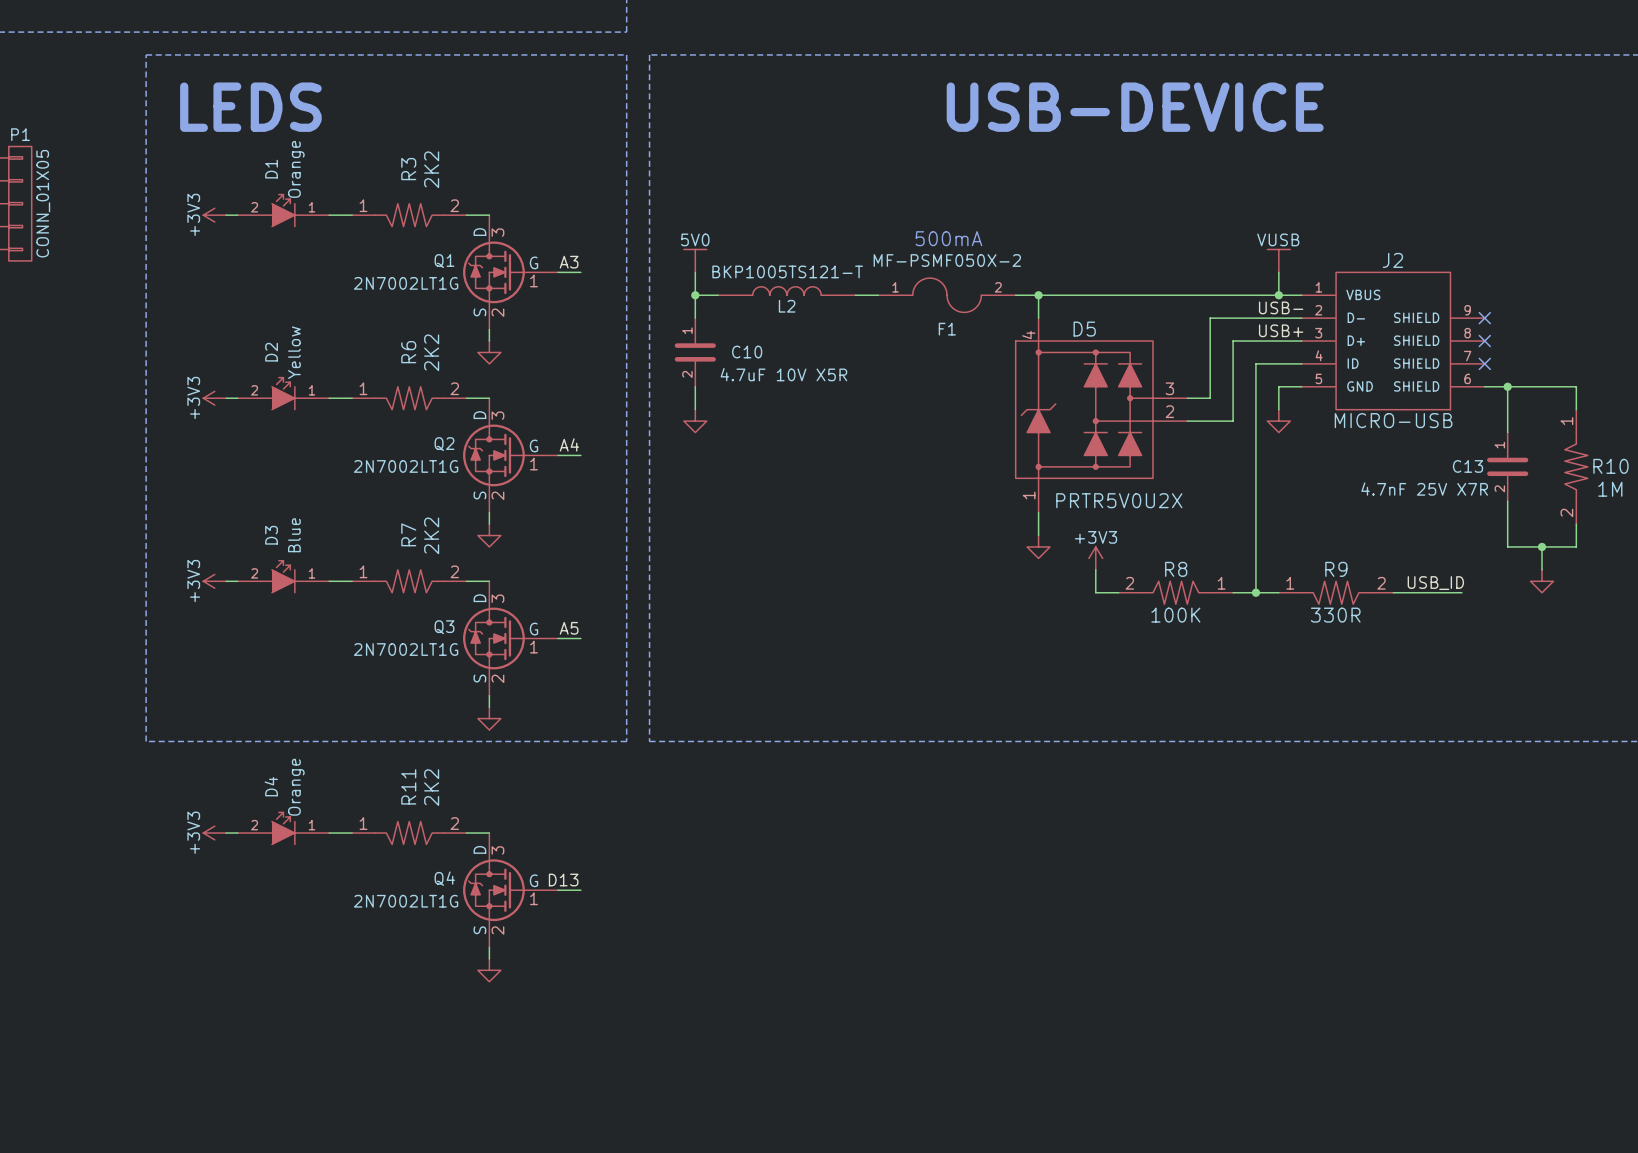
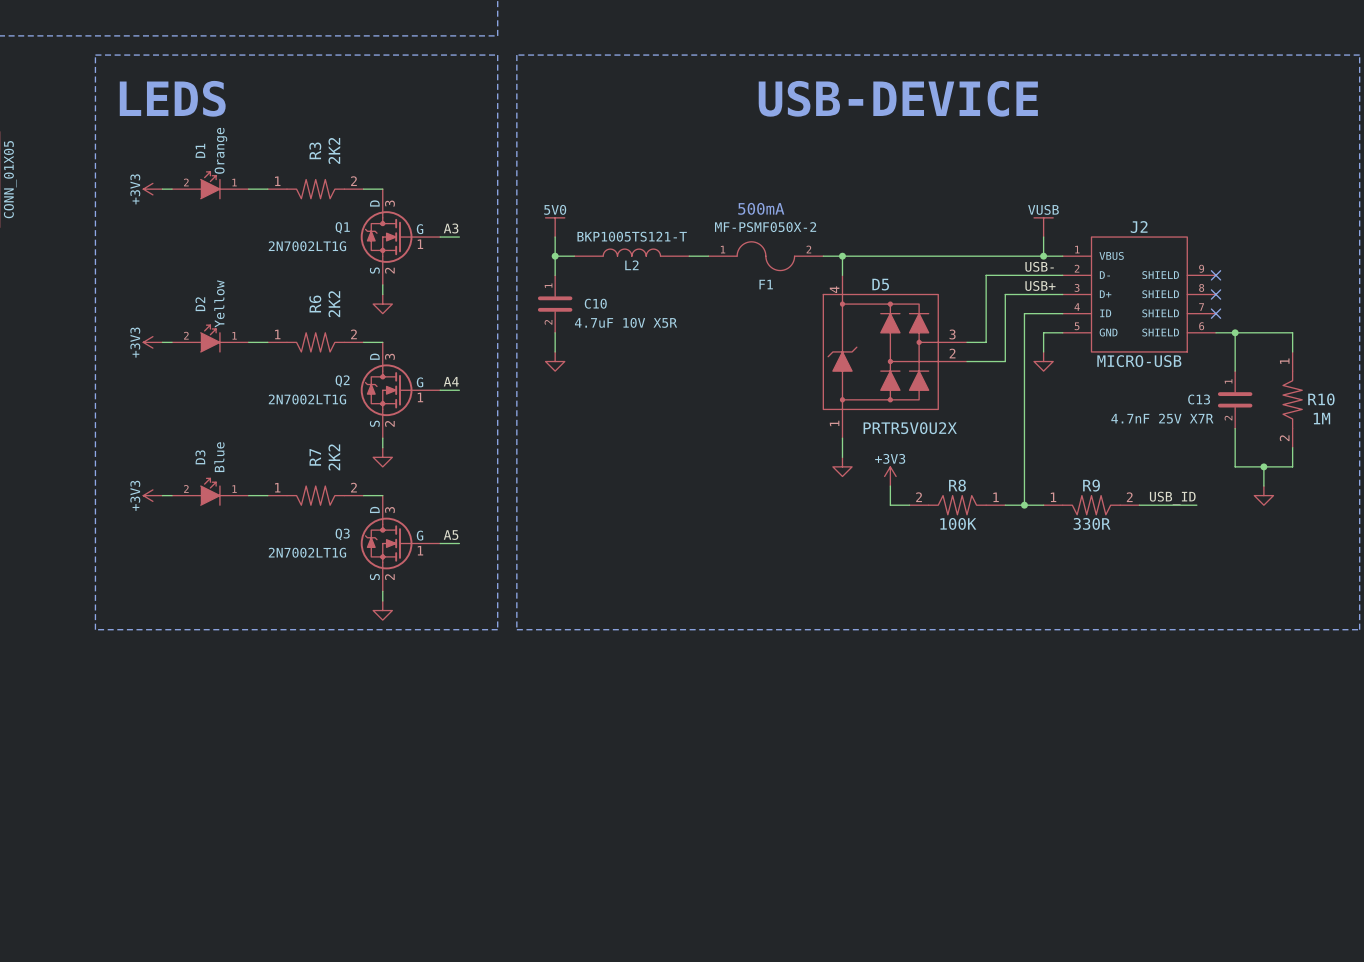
D4: Orange (283, 828) -> none
power symbol: +3V3 (214, 833) -> none
wire: (226, 833) (237, 833) -> none
wire: (329, 833) (352, 833) -> none
R11: 2K2 (409, 833) -> none
wire: (466, 833) (489, 833) -> none
label: D13 (563, 880) -> none
Q4: 2N7002LT1G (510, 890) -> none
wire: (558, 890) (580, 890) -> none
wire: (489, 947) (489, 958) -> none
power symbol: (489, 970) -> none

